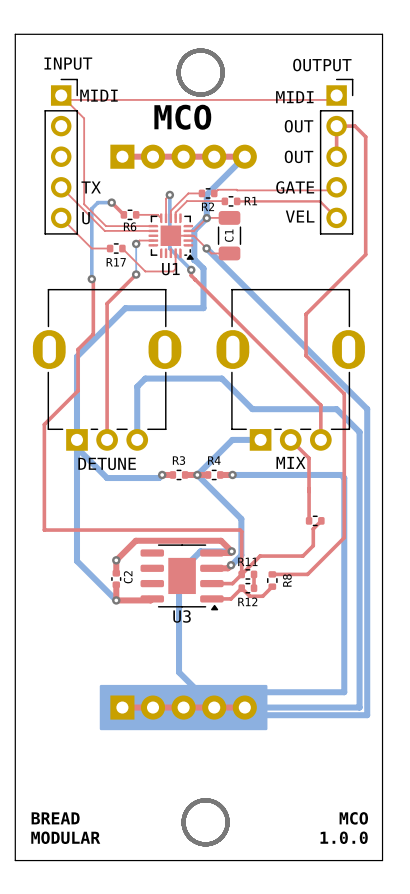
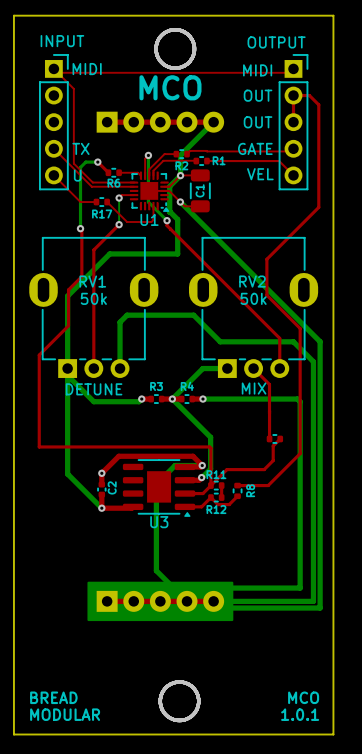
RV1 name: none -> RV1 (92, 281)
RV2 name: none -> RV2 (252, 281)
RV1 value: none -> 50k (93, 298)
RV2 value: none -> 50k (253, 298)
text: 1.0.0 (344, 837) -> 1.0.1 (300, 714)

